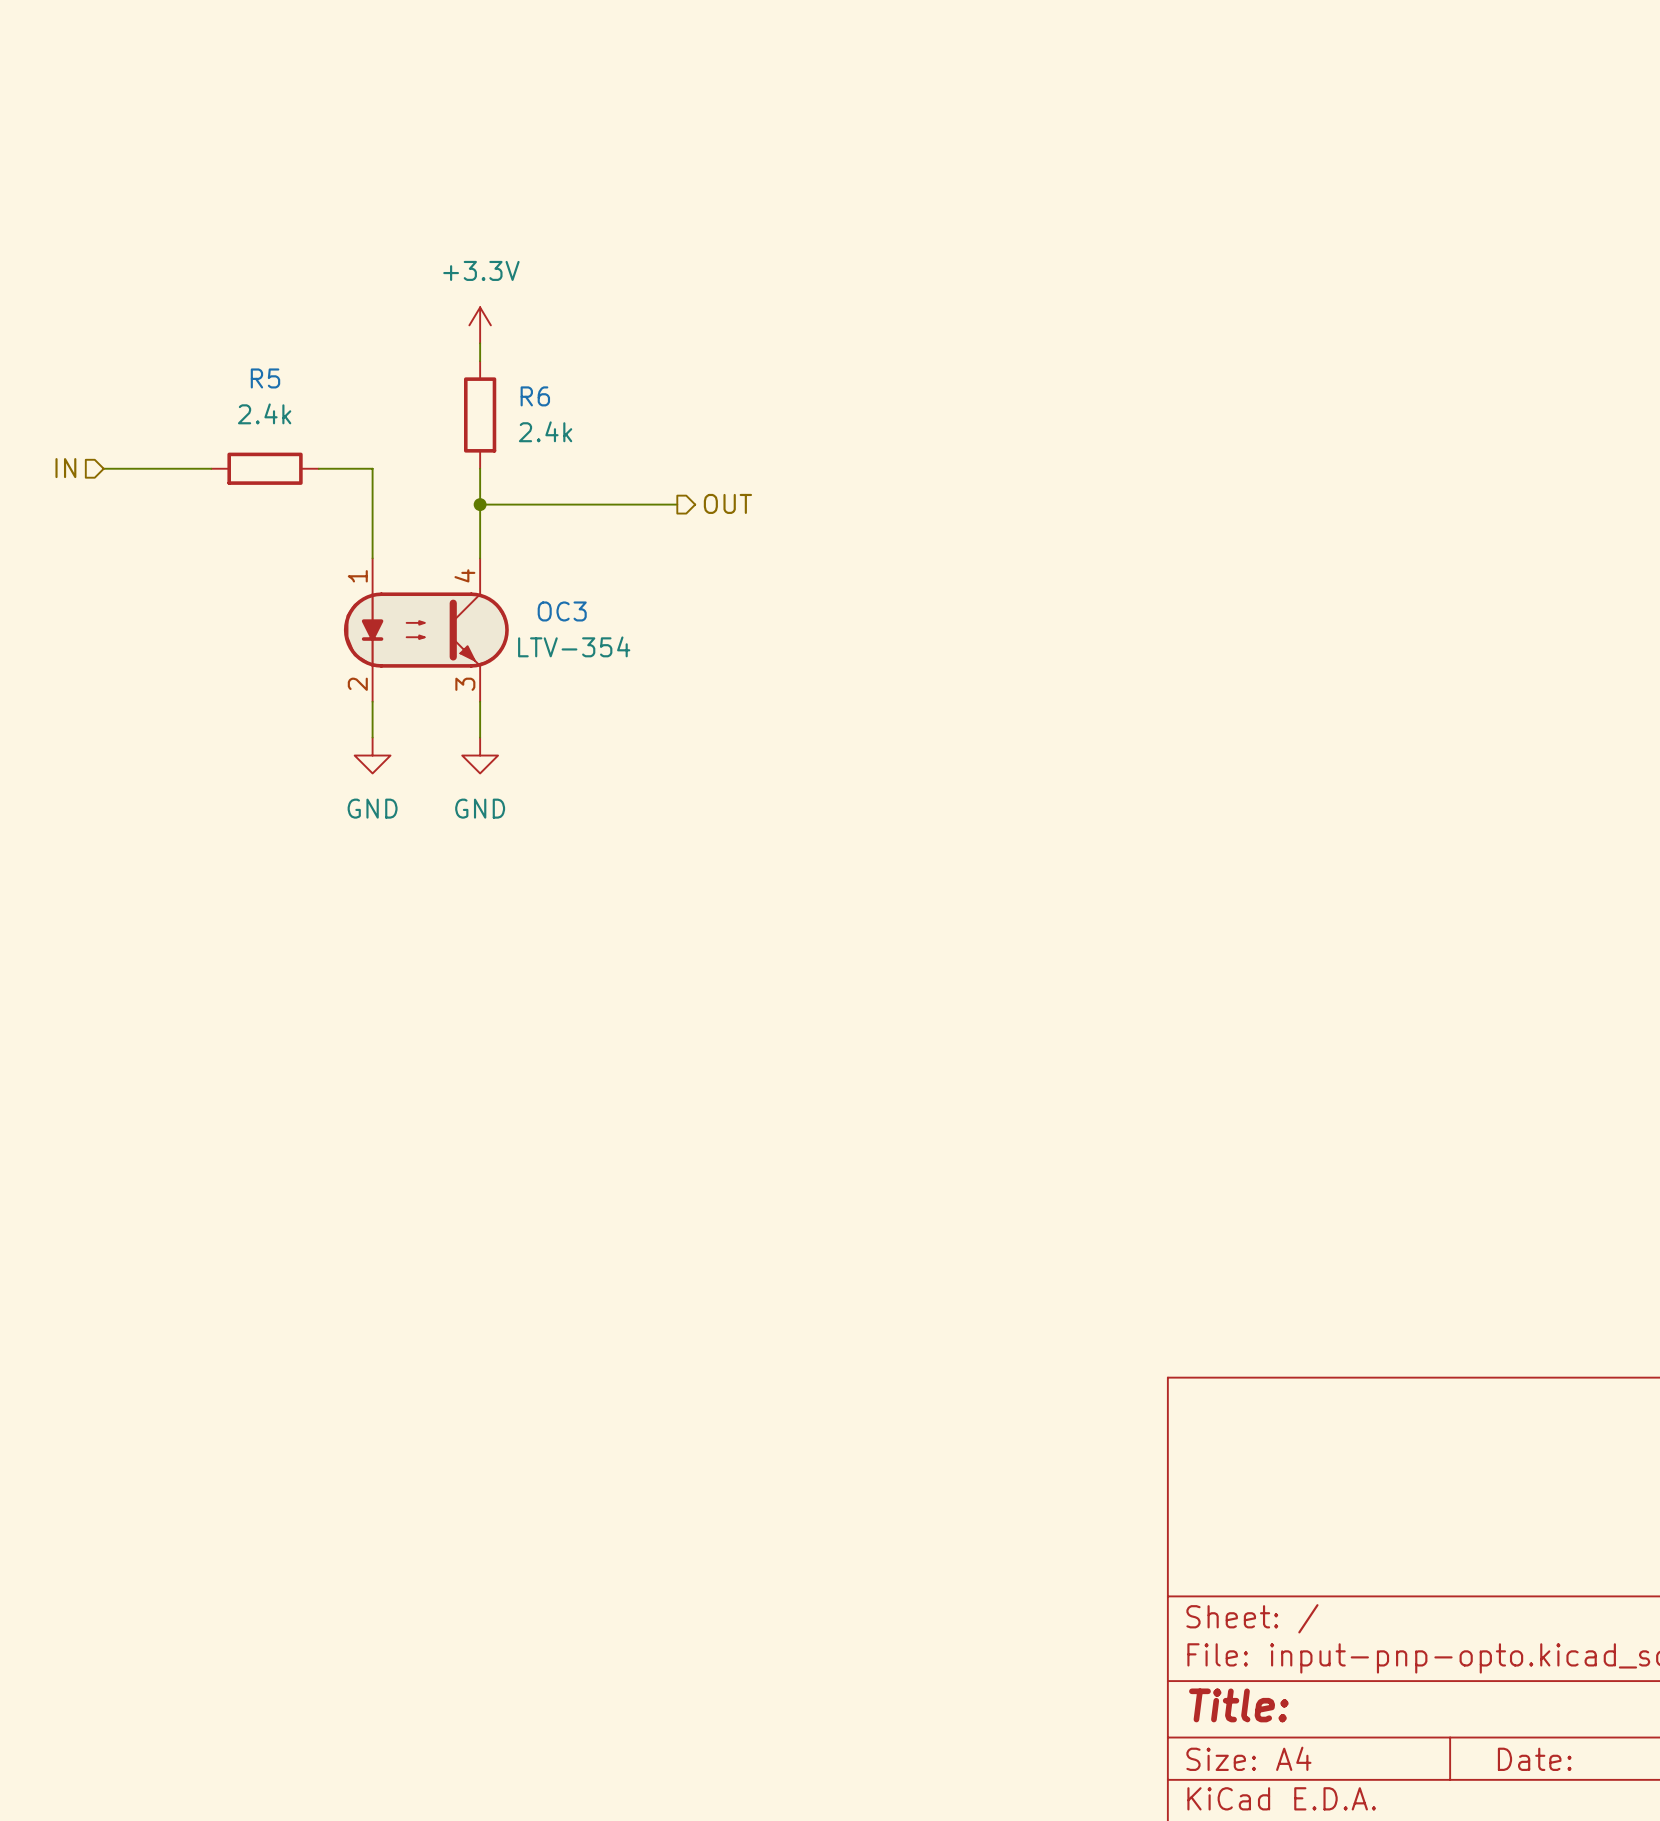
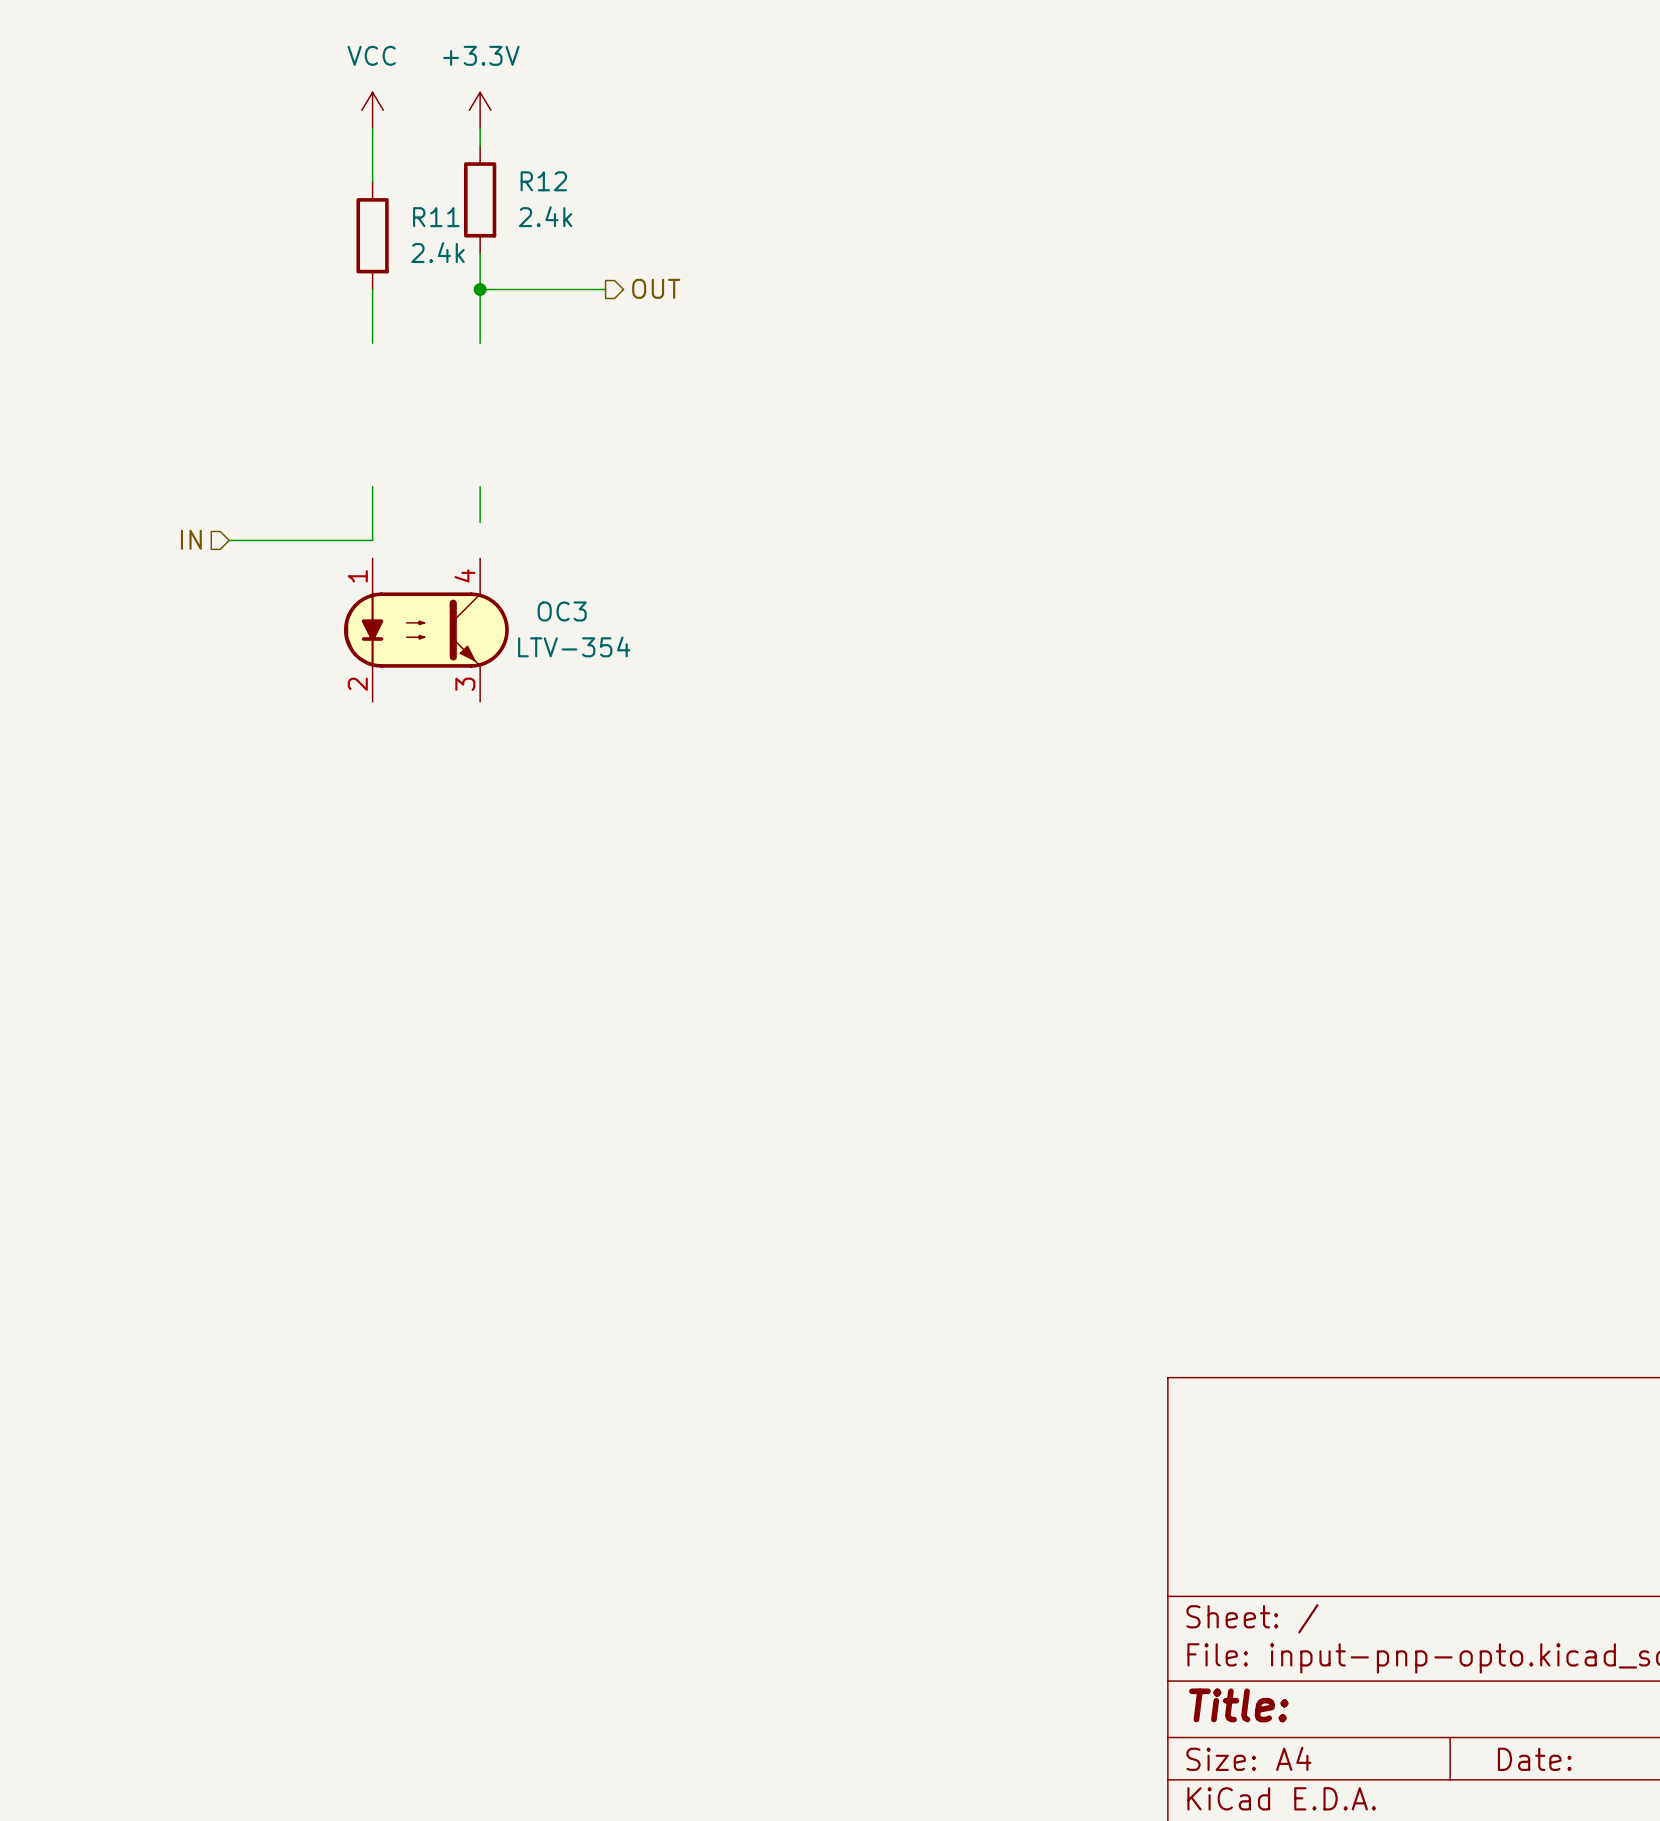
power symbol: none -> VCC (372, 110)
wire: none -> (372, 128) (372, 181)
R12: none -> 2.4k (480, 199)
R11: none -> 2.4k (372, 235)
wire: none -> (372, 289) (372, 343)
wire: none -> (480, 289) (605, 289)
junction: none -> (480, 289)
power symbol position: +3.3V (480, 325) -> +3.3V (480, 110)
wire: (480, 343) (480, 361) -> (480, 343) (480, 253)
R6: 2.4k (480, 414) -> none
hierarchical label position: IN (65, 468) -> IN (191, 539)
wire: (103, 468) (211, 468) -> none
R5: 2.4k (265, 468) -> none
wire: (318, 468) (372, 468) (372, 486) -> none
wire: (480, 468) (480, 486) -> (480, 128) (480, 146)
hierarchical label position: OUT (727, 503) -> OUT (656, 288)
wire: (480, 504) (677, 504) -> none
junction: (480, 504) -> none
wire: (480, 522) (480, 558) -> none
wire: (372, 540) (372, 558) -> (372, 540) (229, 540)
wire: (372, 701) (372, 737) -> none
wire: (480, 701) (480, 737) -> none
power symbol: GND (372, 755) -> none
power symbol: GND (480, 755) -> none

